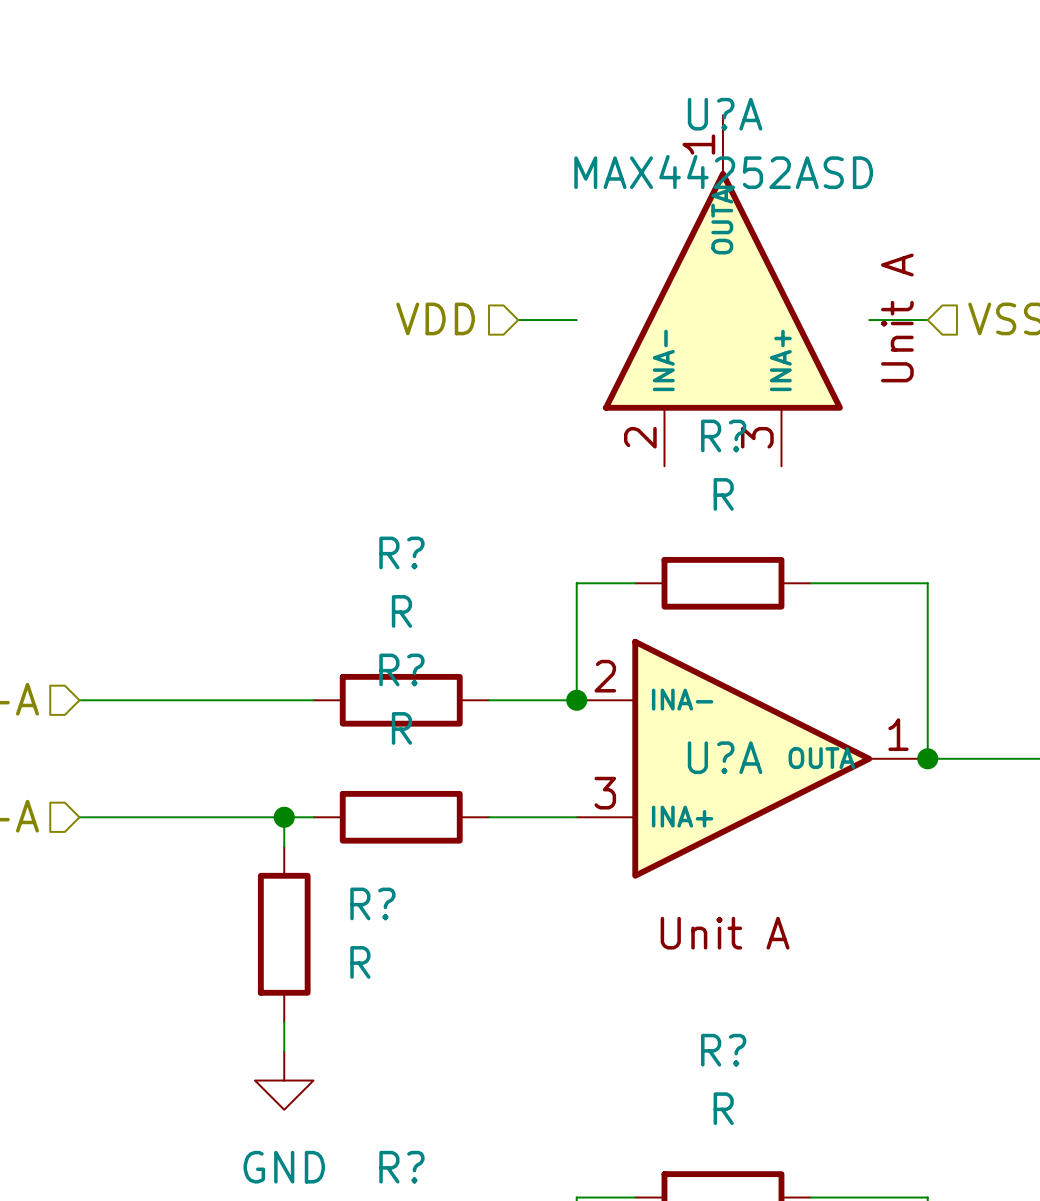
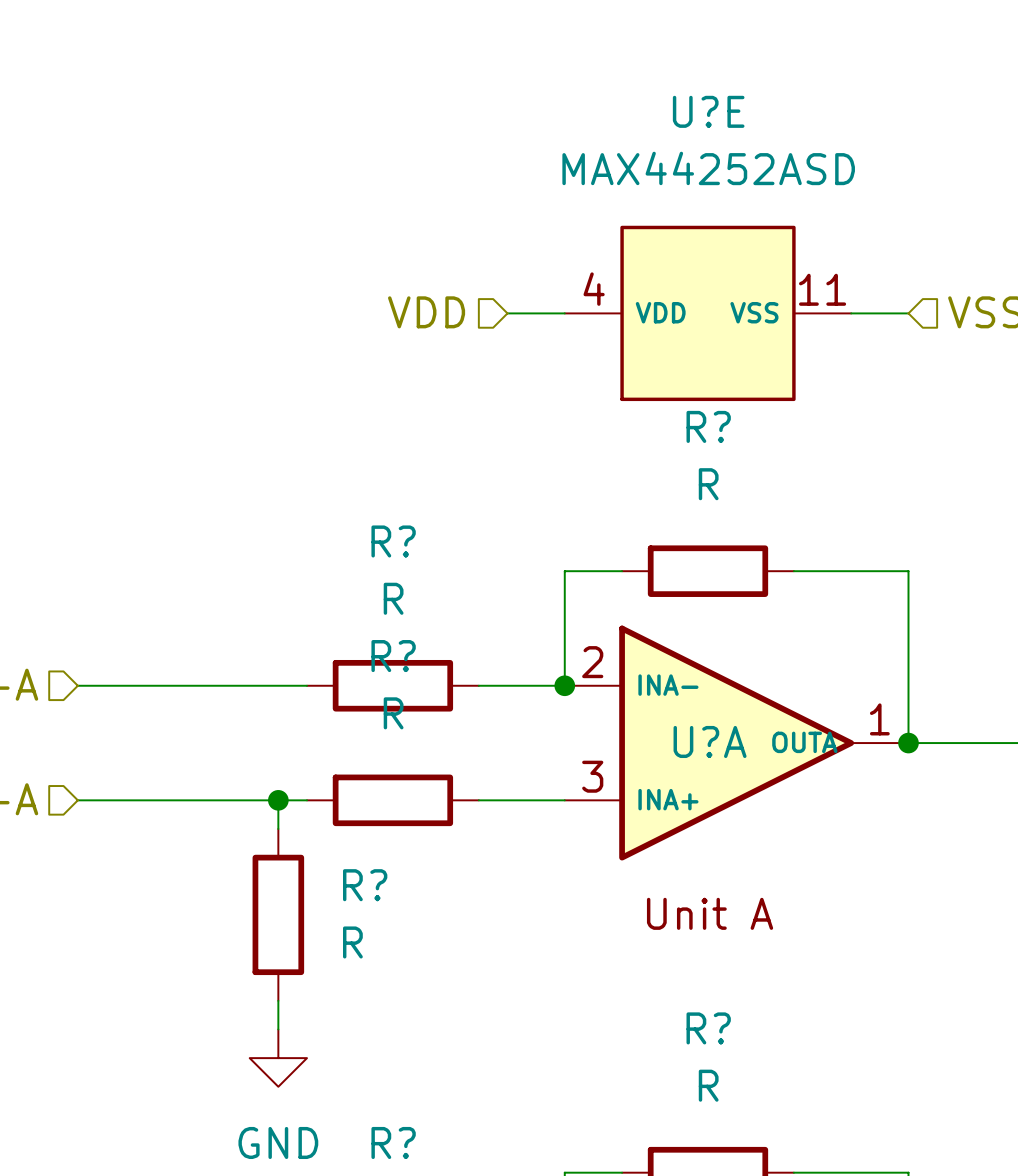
U?A: MAX44252ASD (722, 290) -> none
U?E: none -> MAX44252ASD (707, 313)

